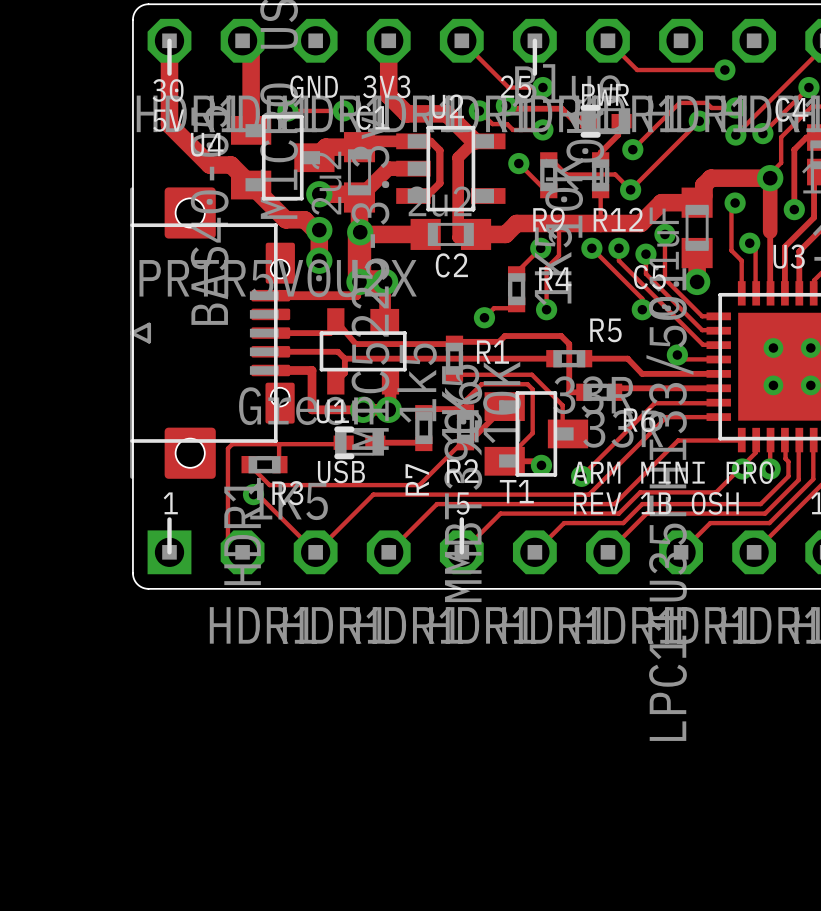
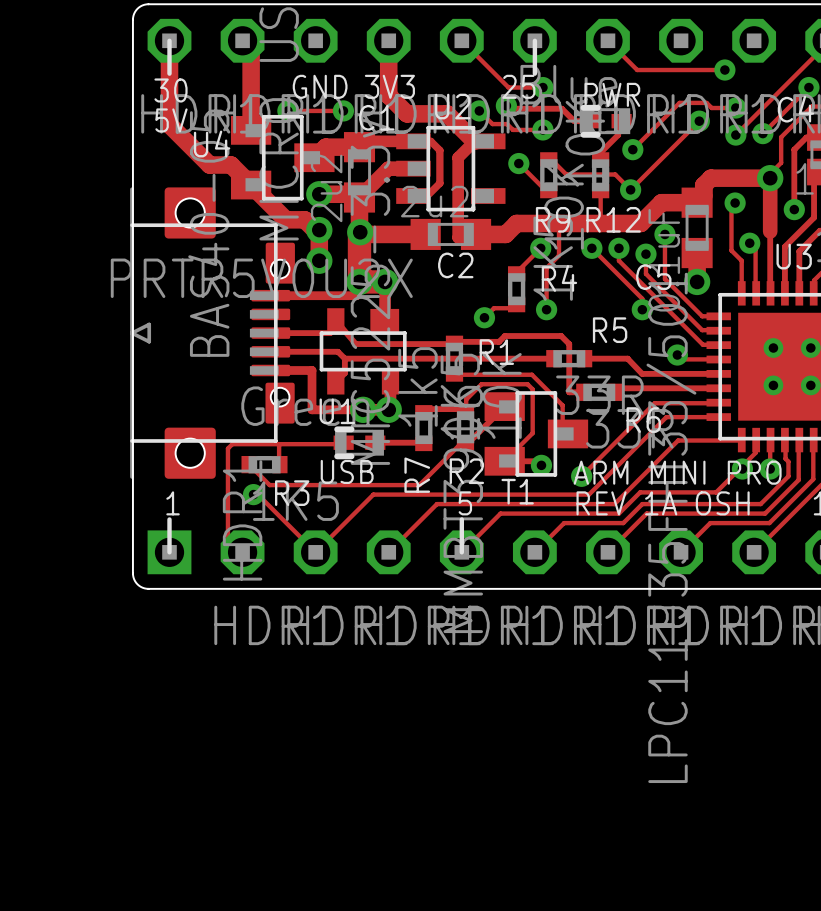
text: REV 1B OSH (656, 503) -> REV 1A OSH (663, 503)

